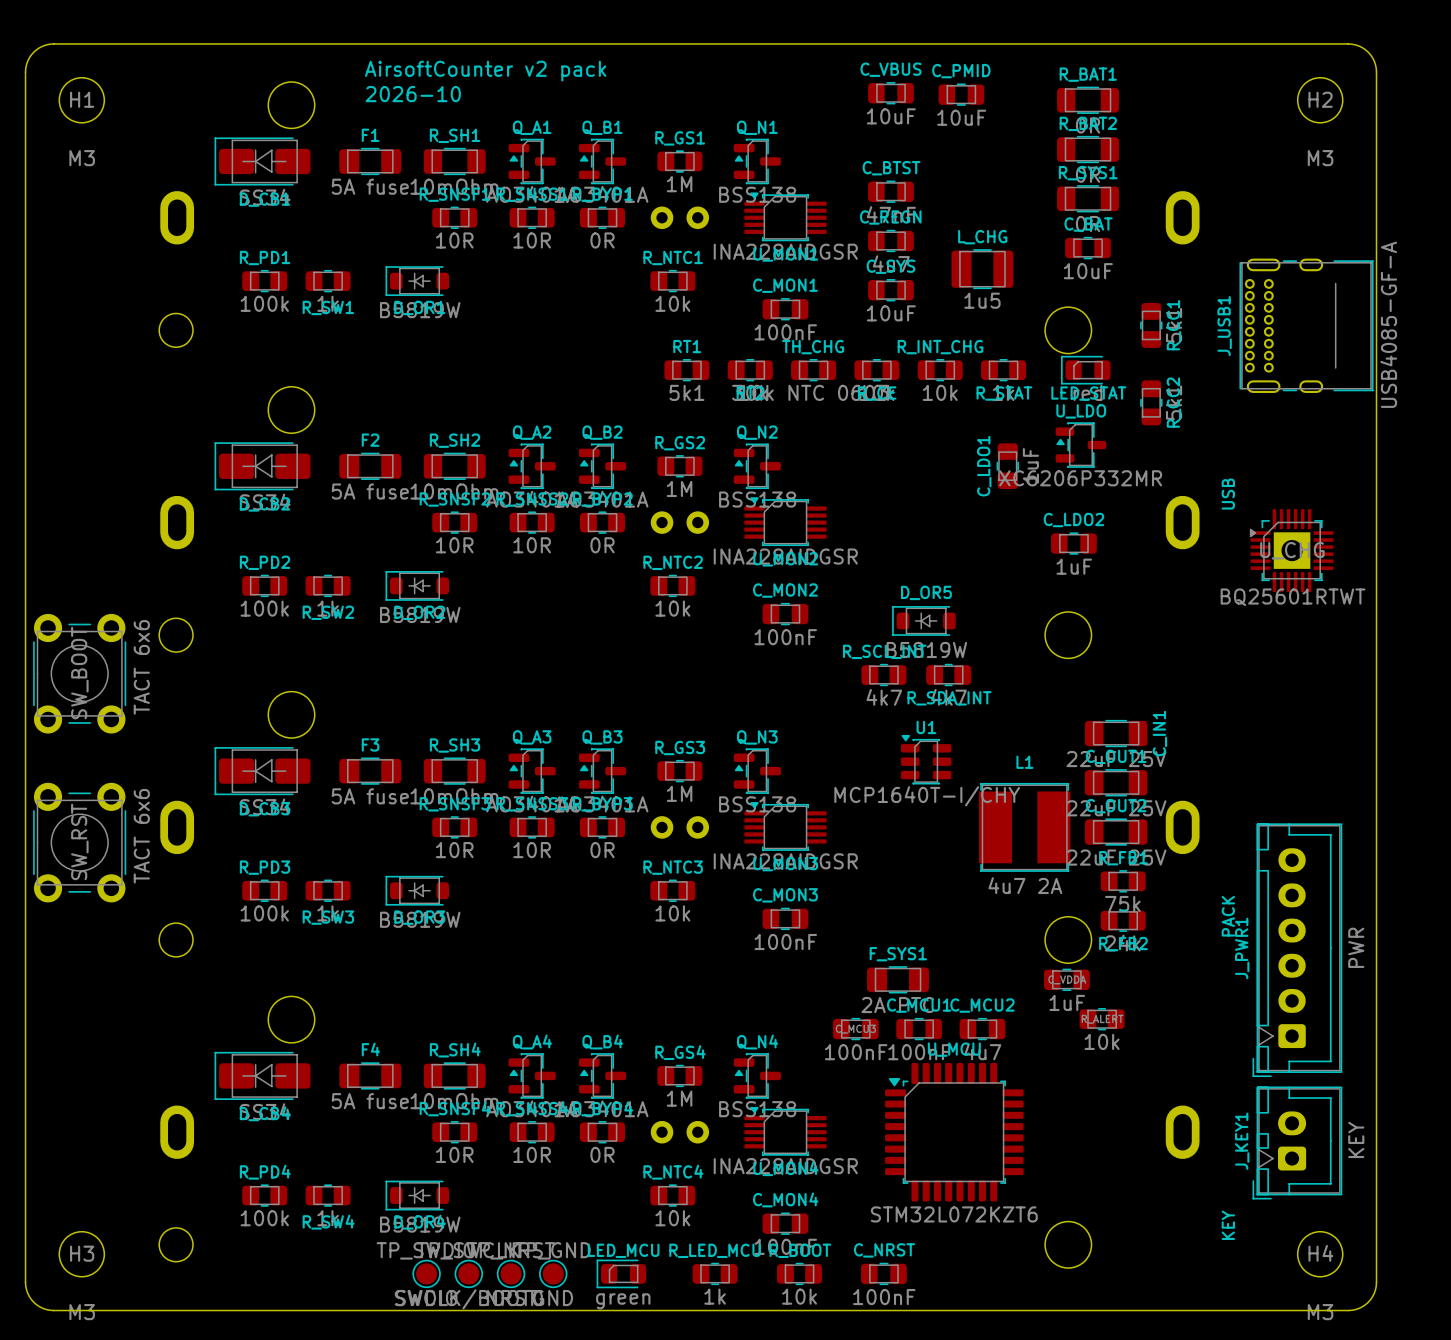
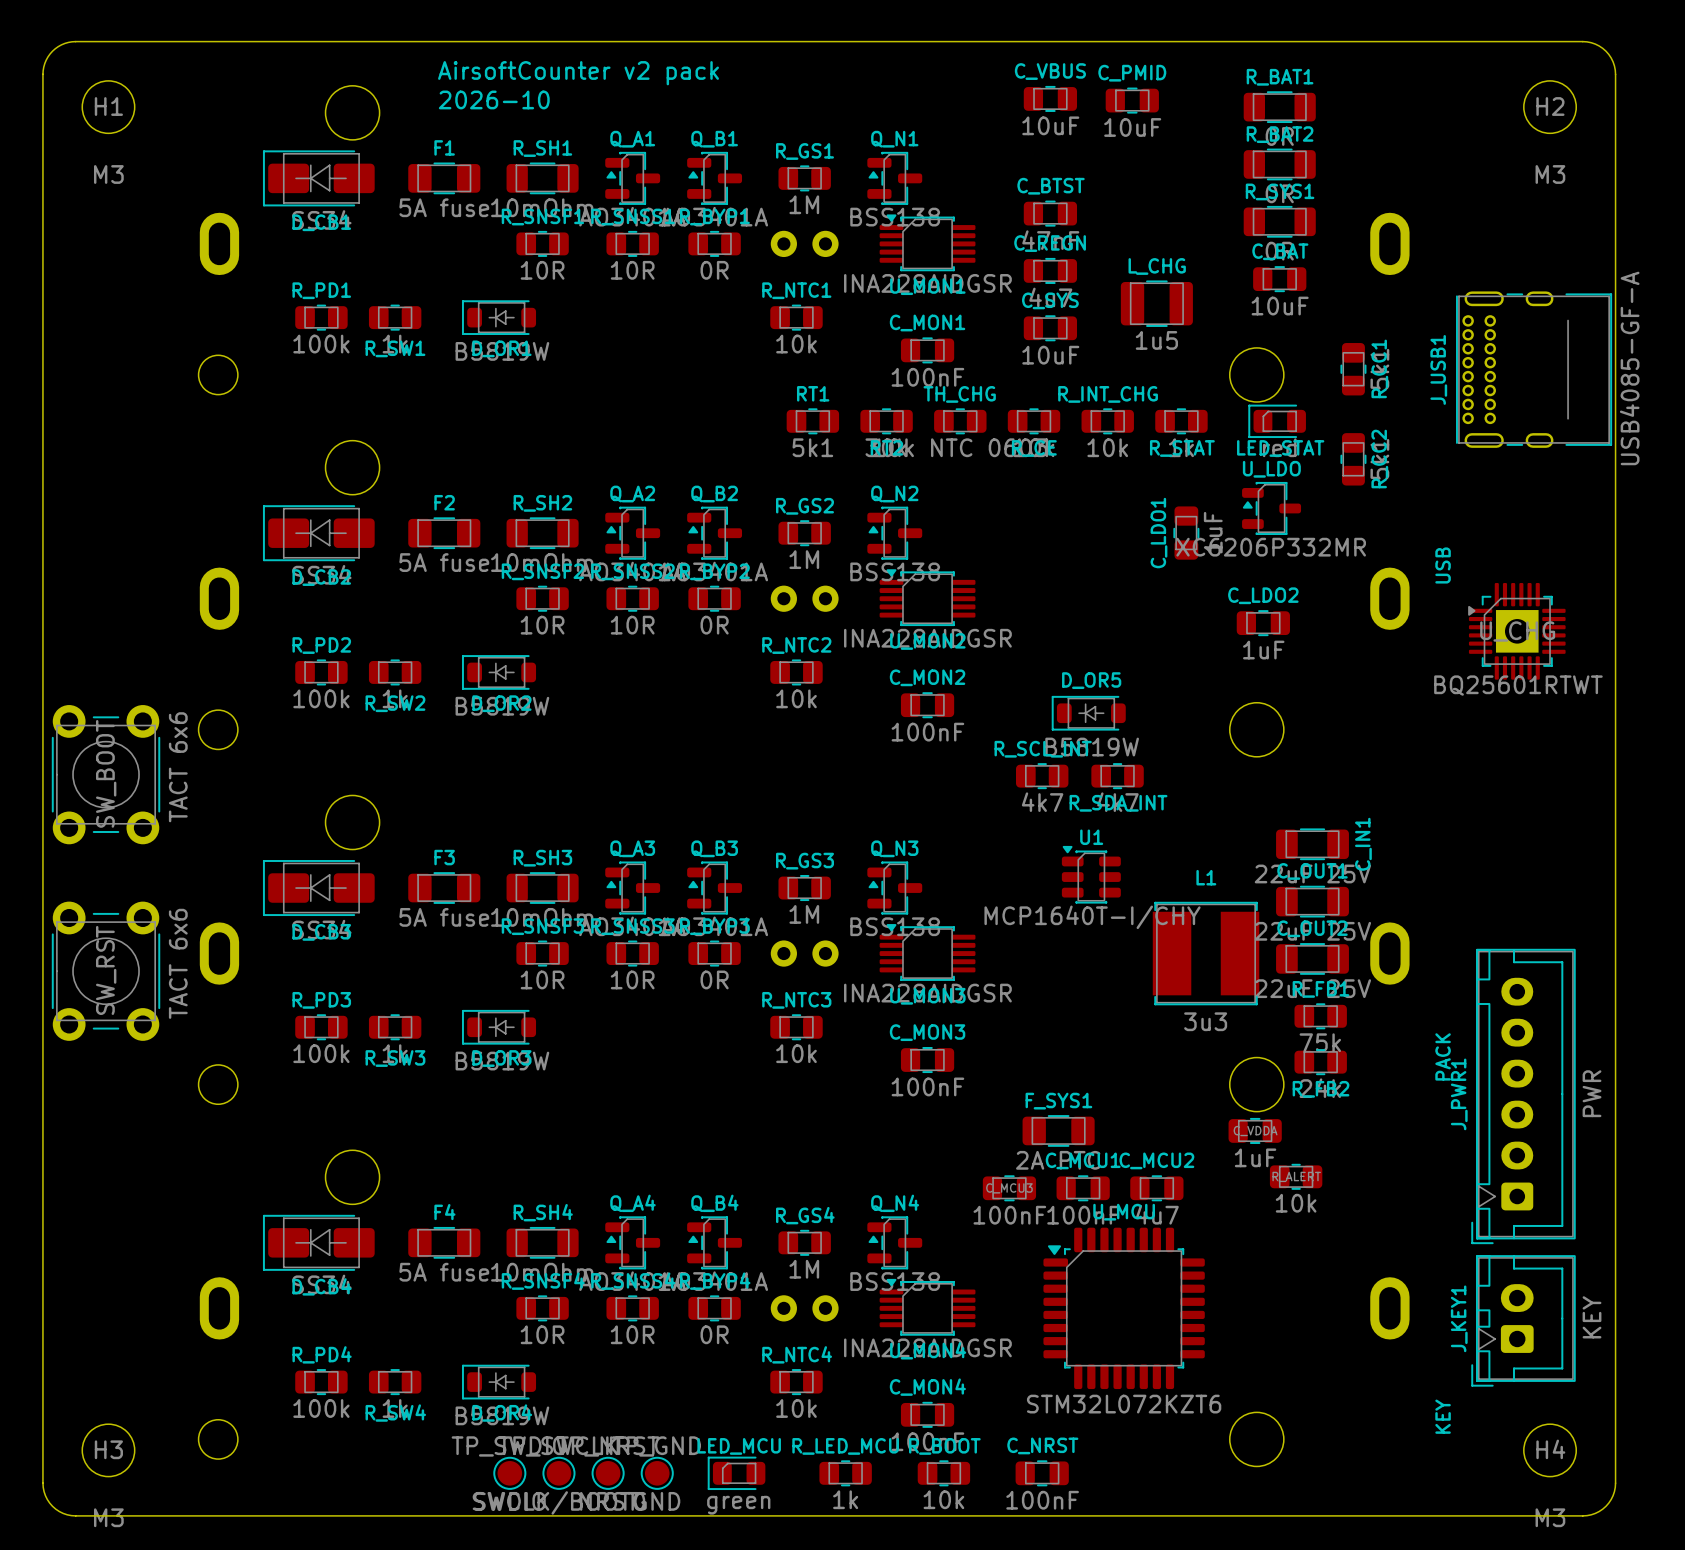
L1 value: 4u7 2A (1025, 885) -> 3u3 (1205, 1021)

